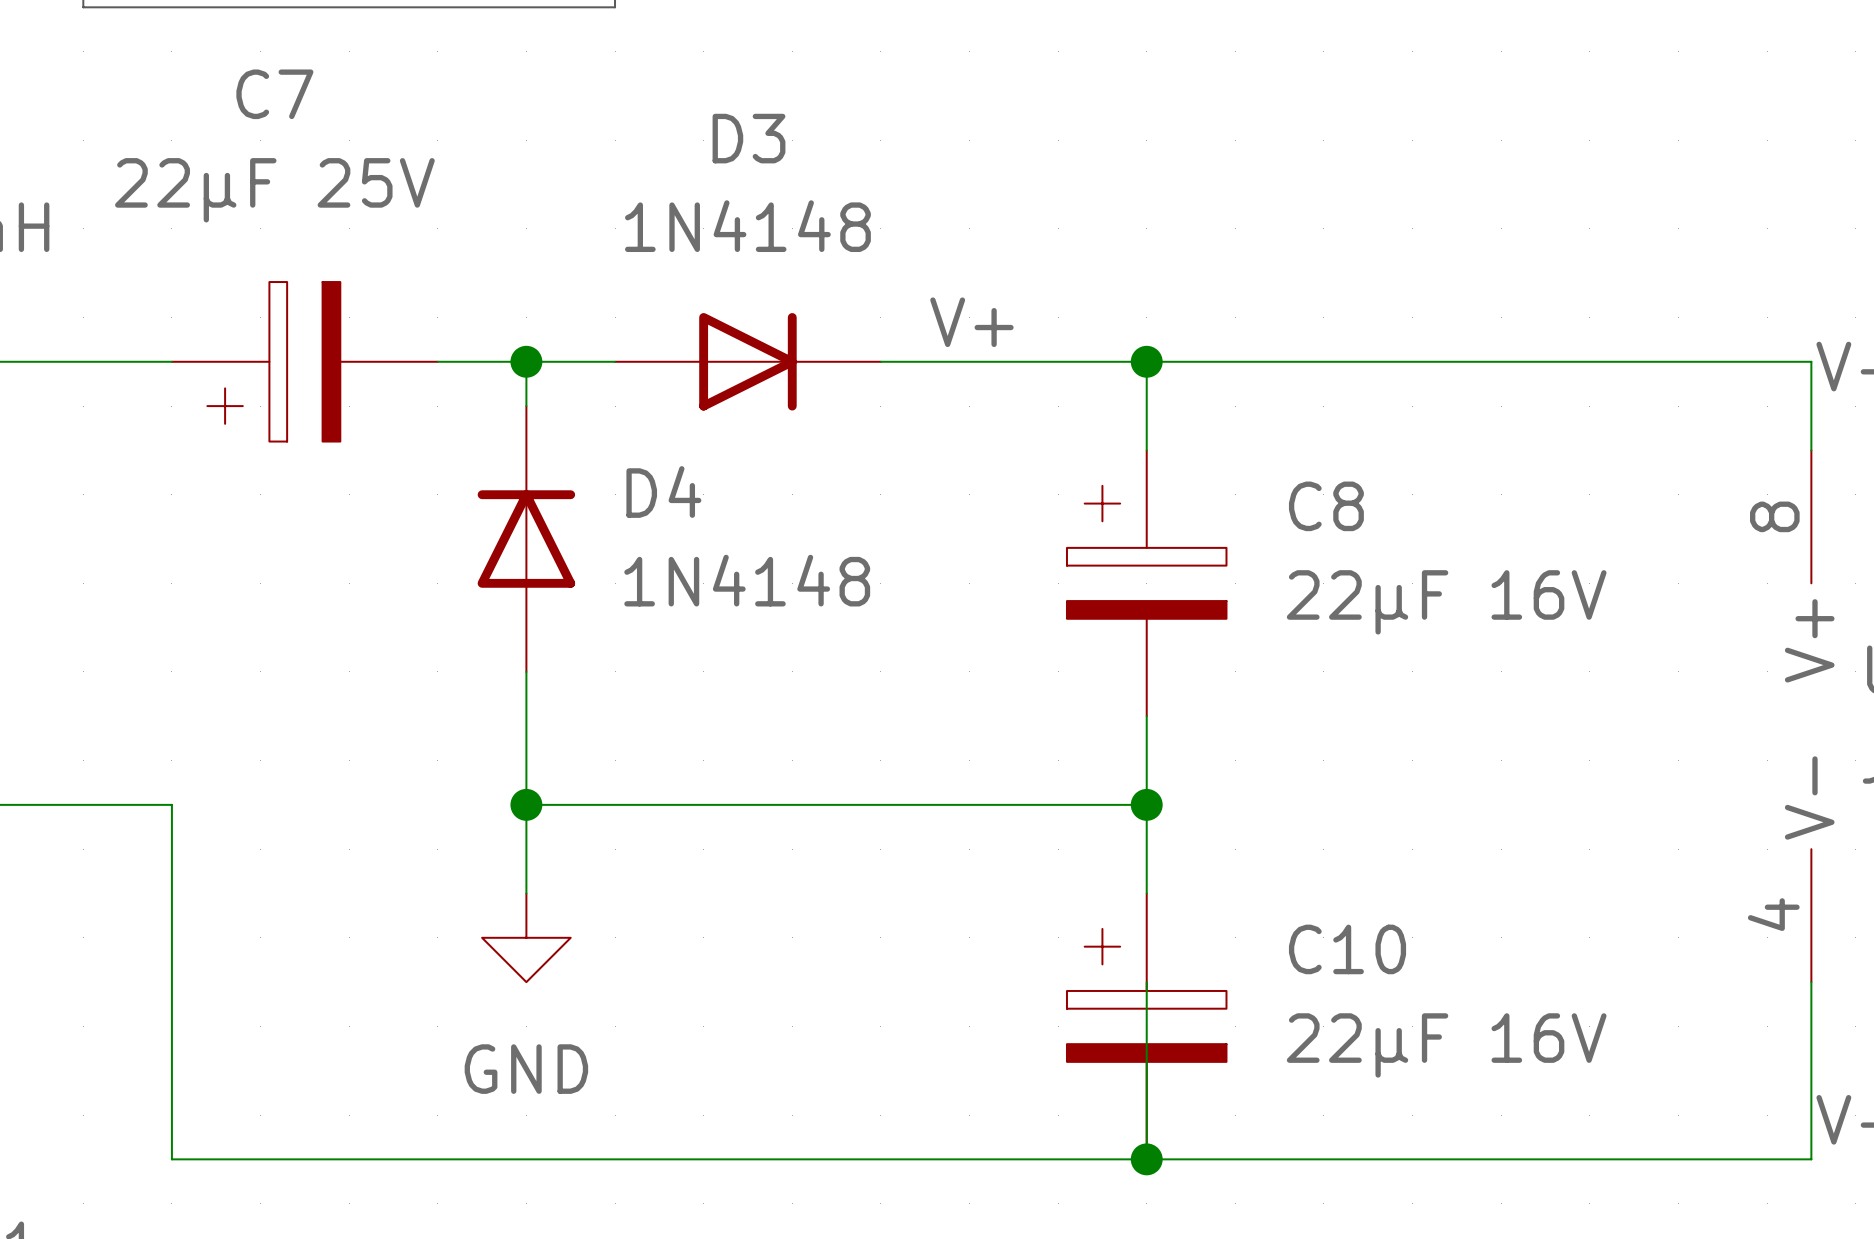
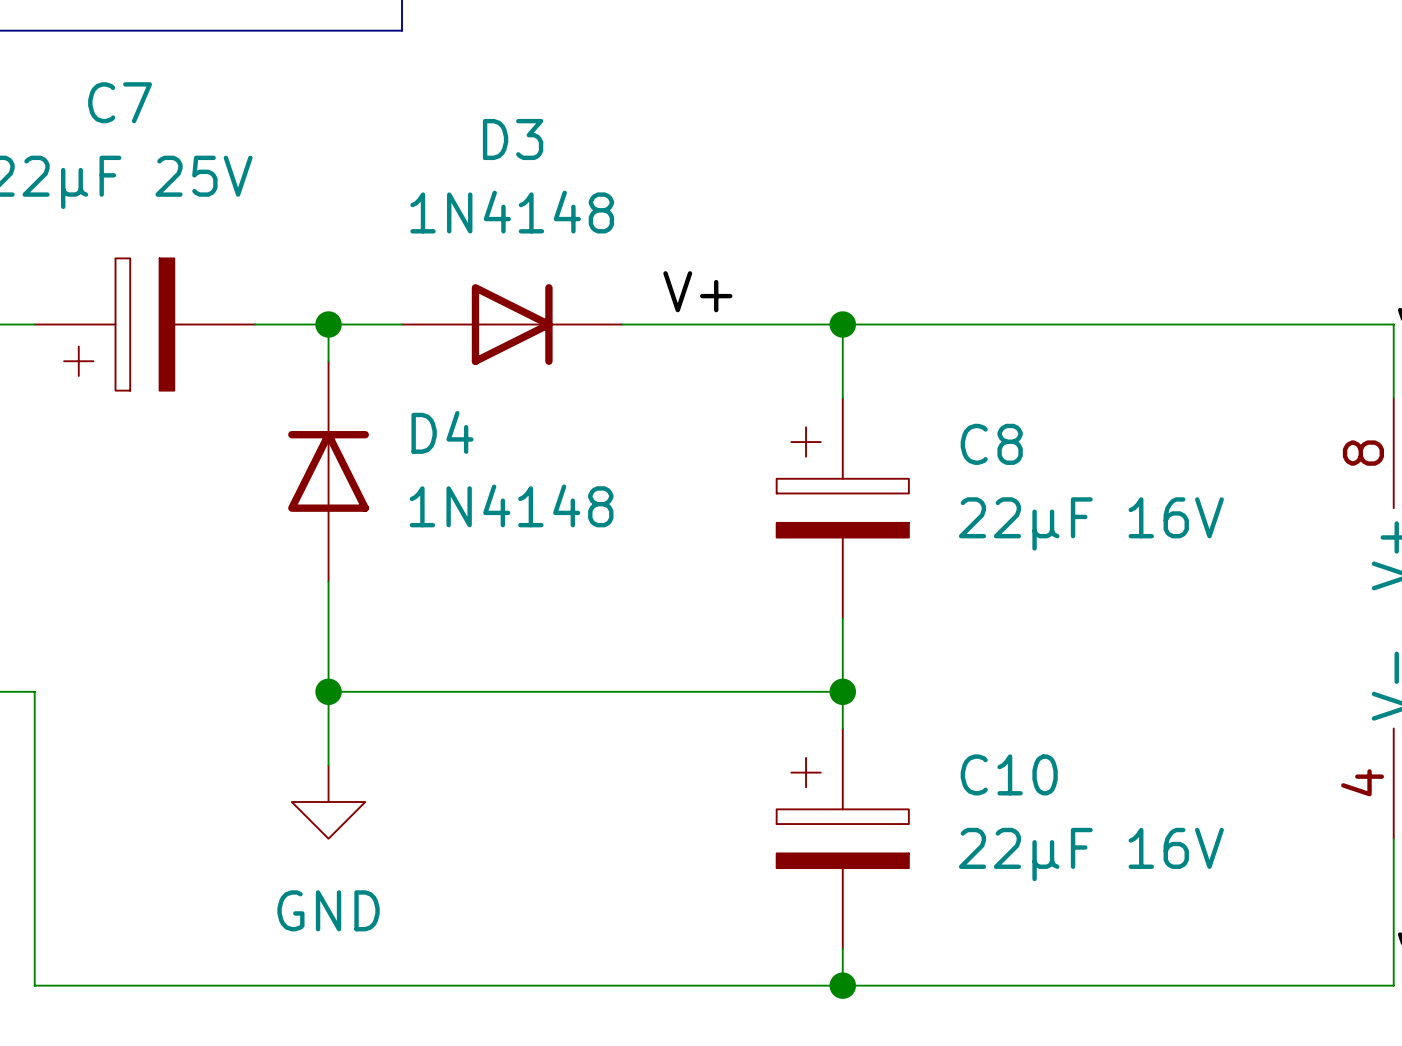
C10 position: (1146, 1026) -> (842, 838)

